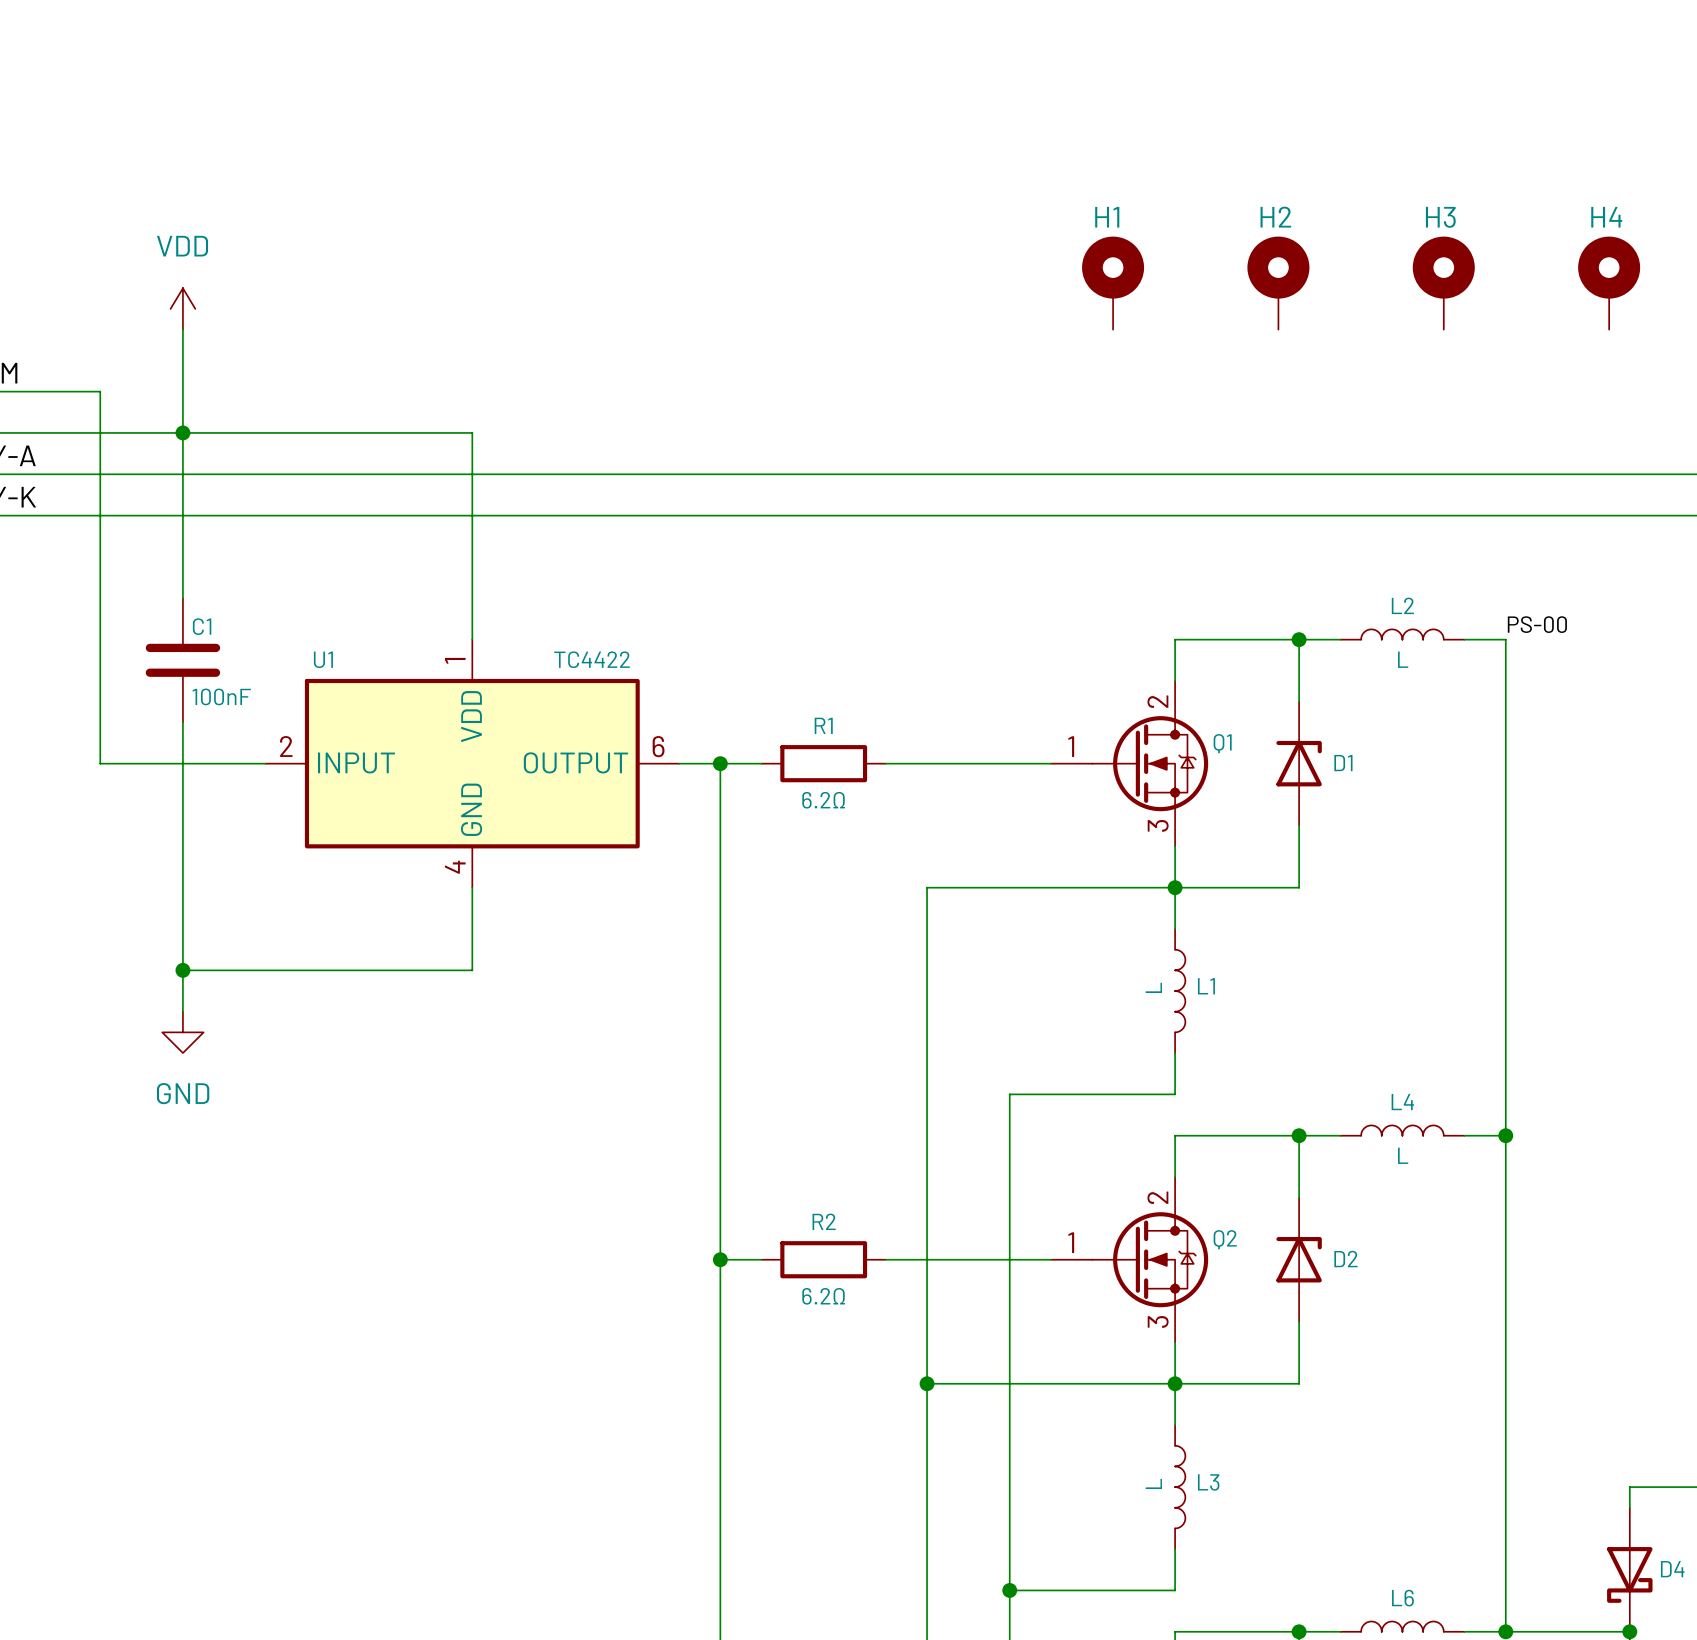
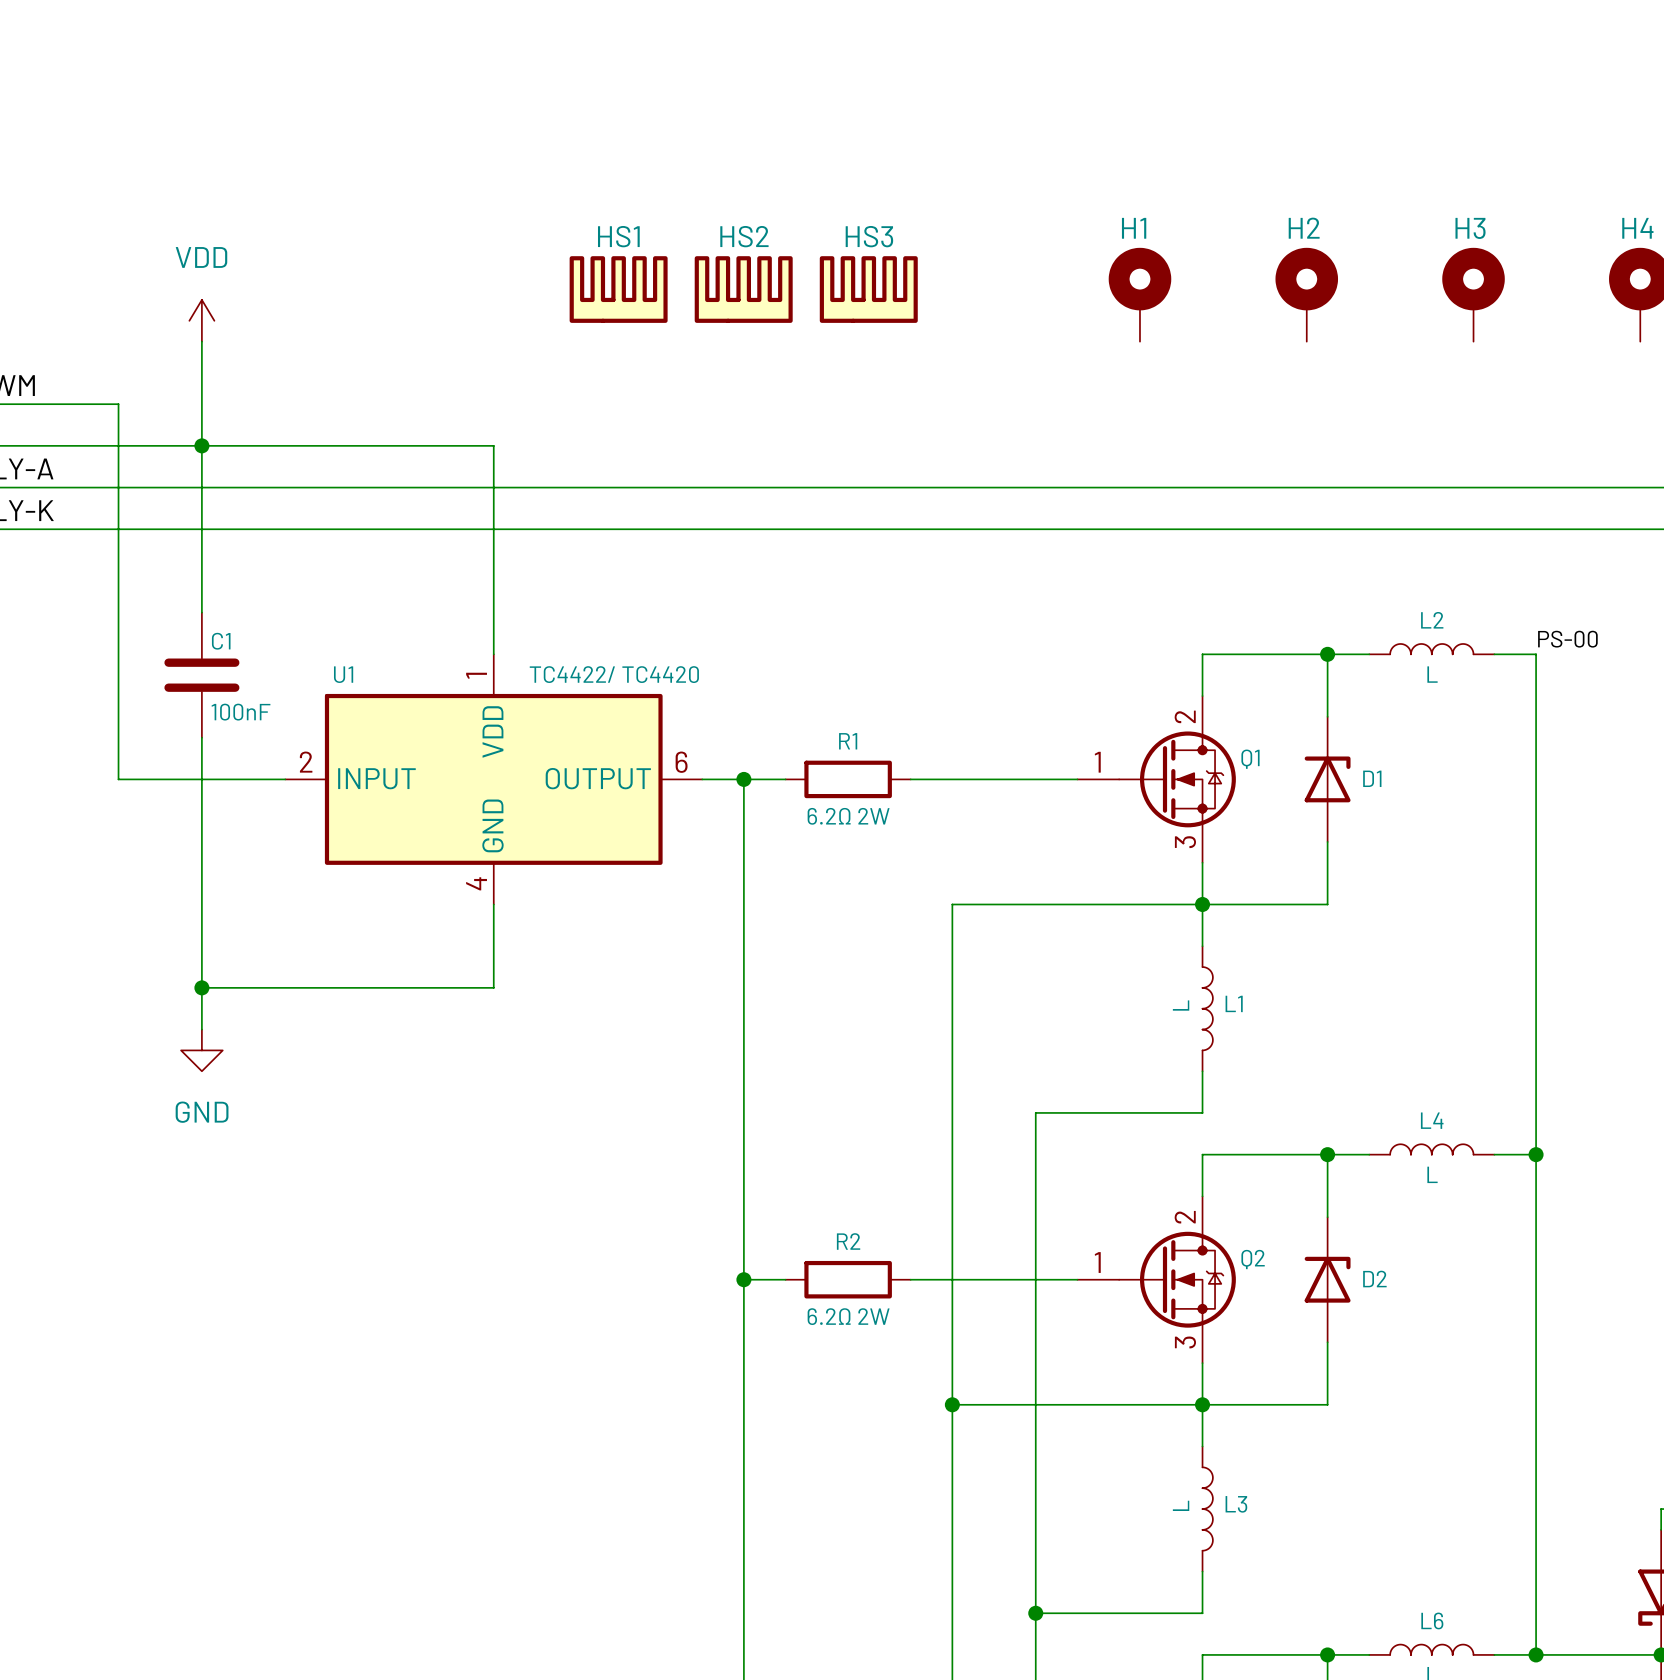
HS1: none -> (618, 289)
HS2: none -> (743, 289)
HS3: none -> (868, 289)
U1 value: TC4422 (592, 659) -> TC4422/ TC4420 (614, 674)
R1 value: 6.2Ω (823, 800) -> 6.2Ω 2W (848, 816)
R2 value: 6.2Ω (823, 1296) -> 6.2Ω 2W (848, 1316)

